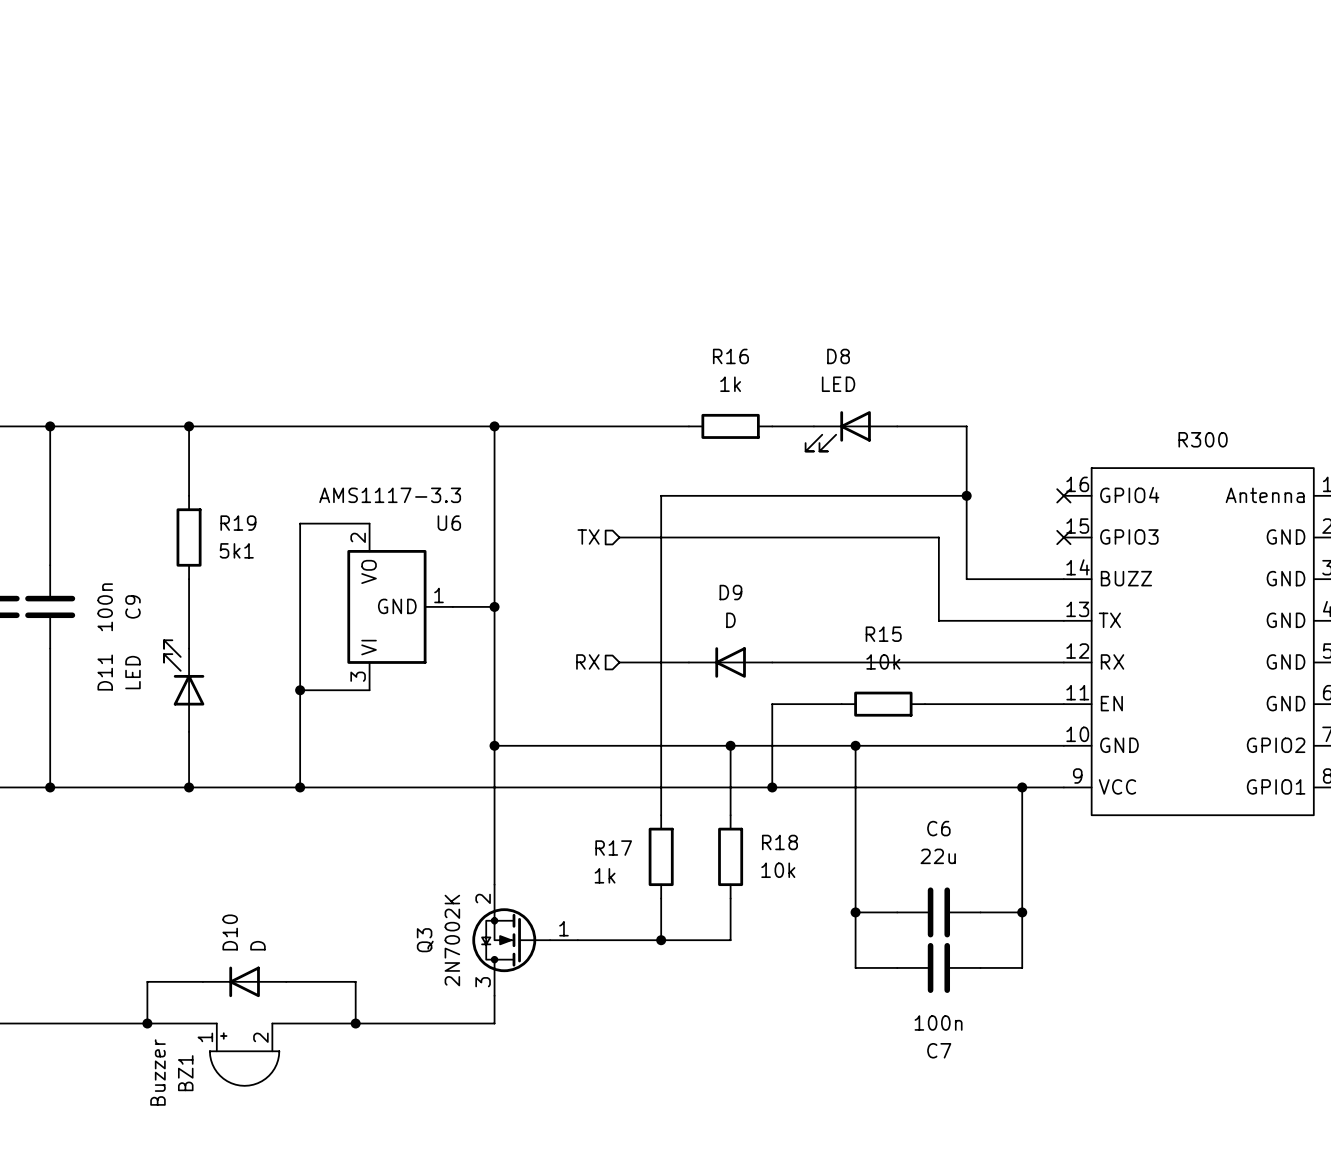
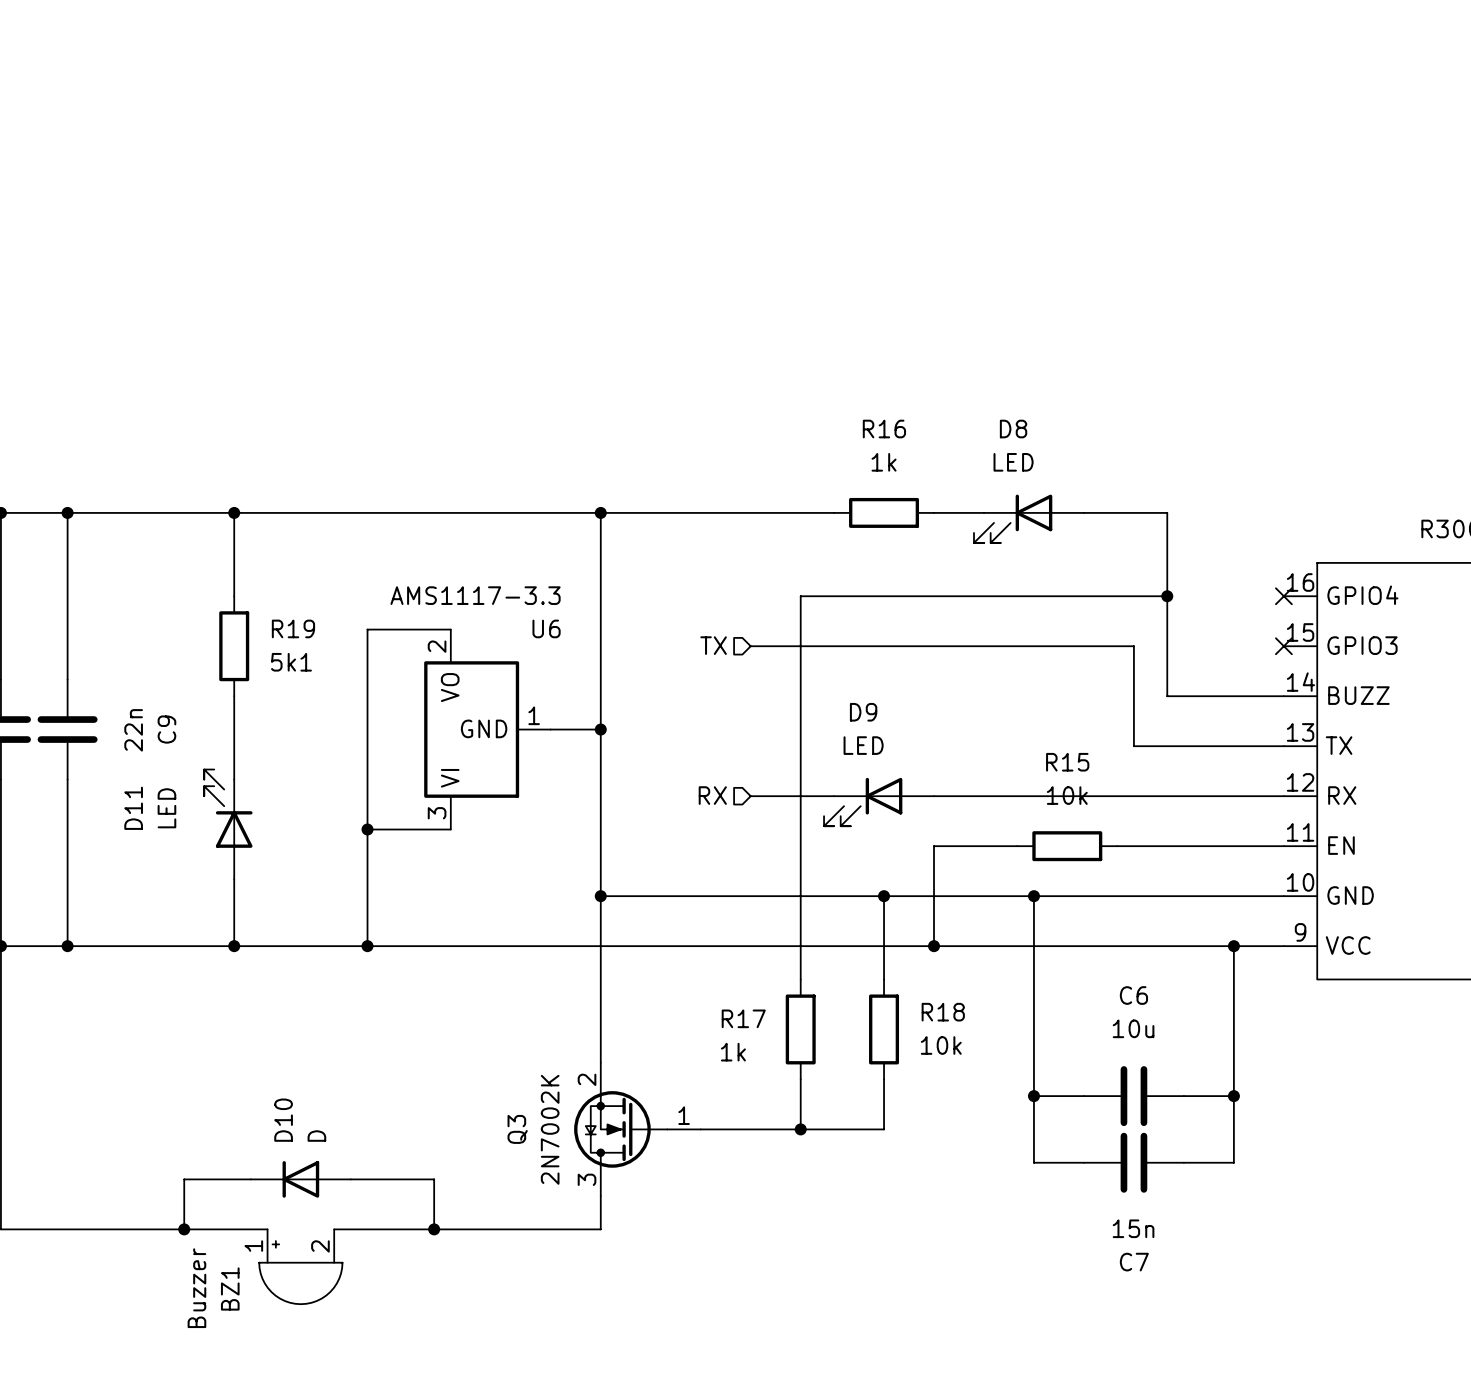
C9 value: 100n (105, 607) -> 22n (133, 730)
D9 value: D (730, 620) -> LED (863, 745)
D9 symbol: [688, 647, 773, 678] -> [824, 777, 935, 827]
C6 value: 22u (938, 856) -> 10u (1133, 1028)
C7 value: 100n (938, 1023) -> 15n (1133, 1228)

